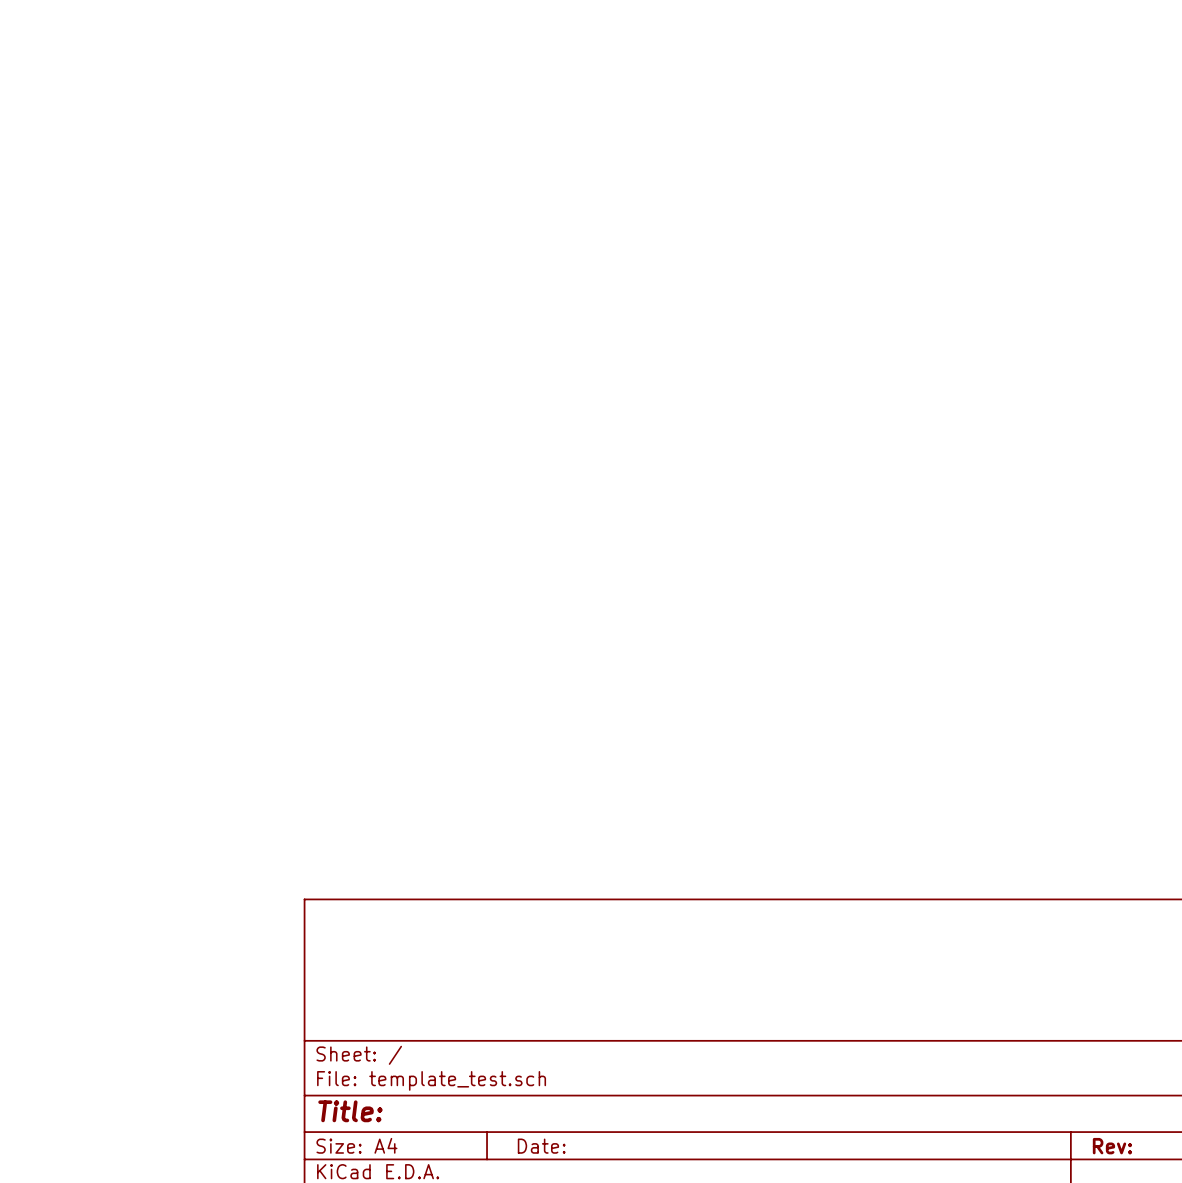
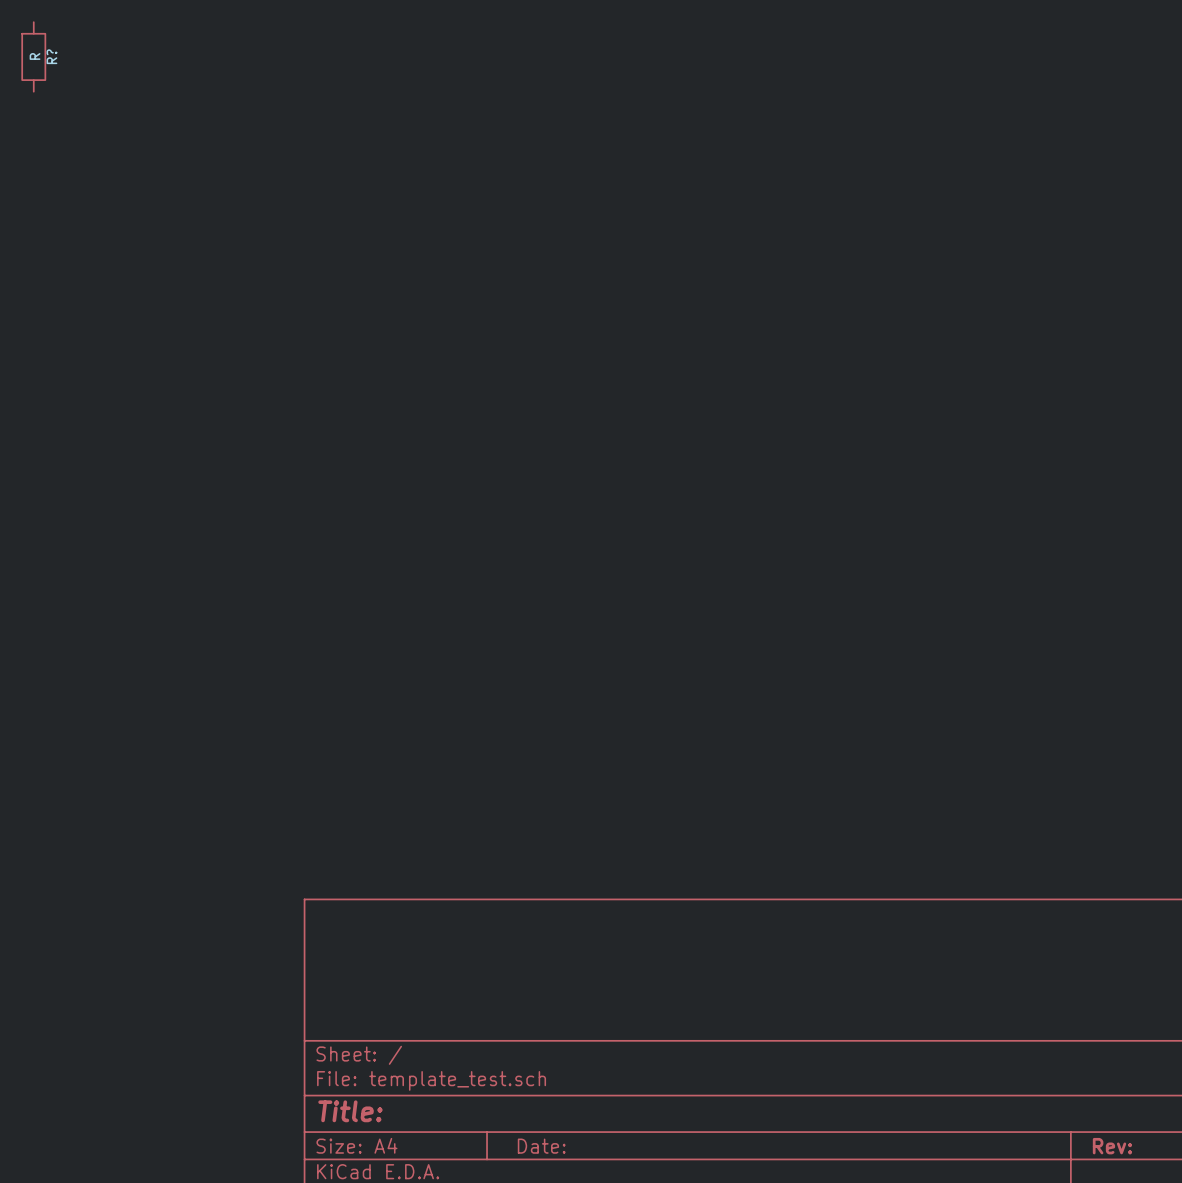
R?: none -> R (33, 56)

